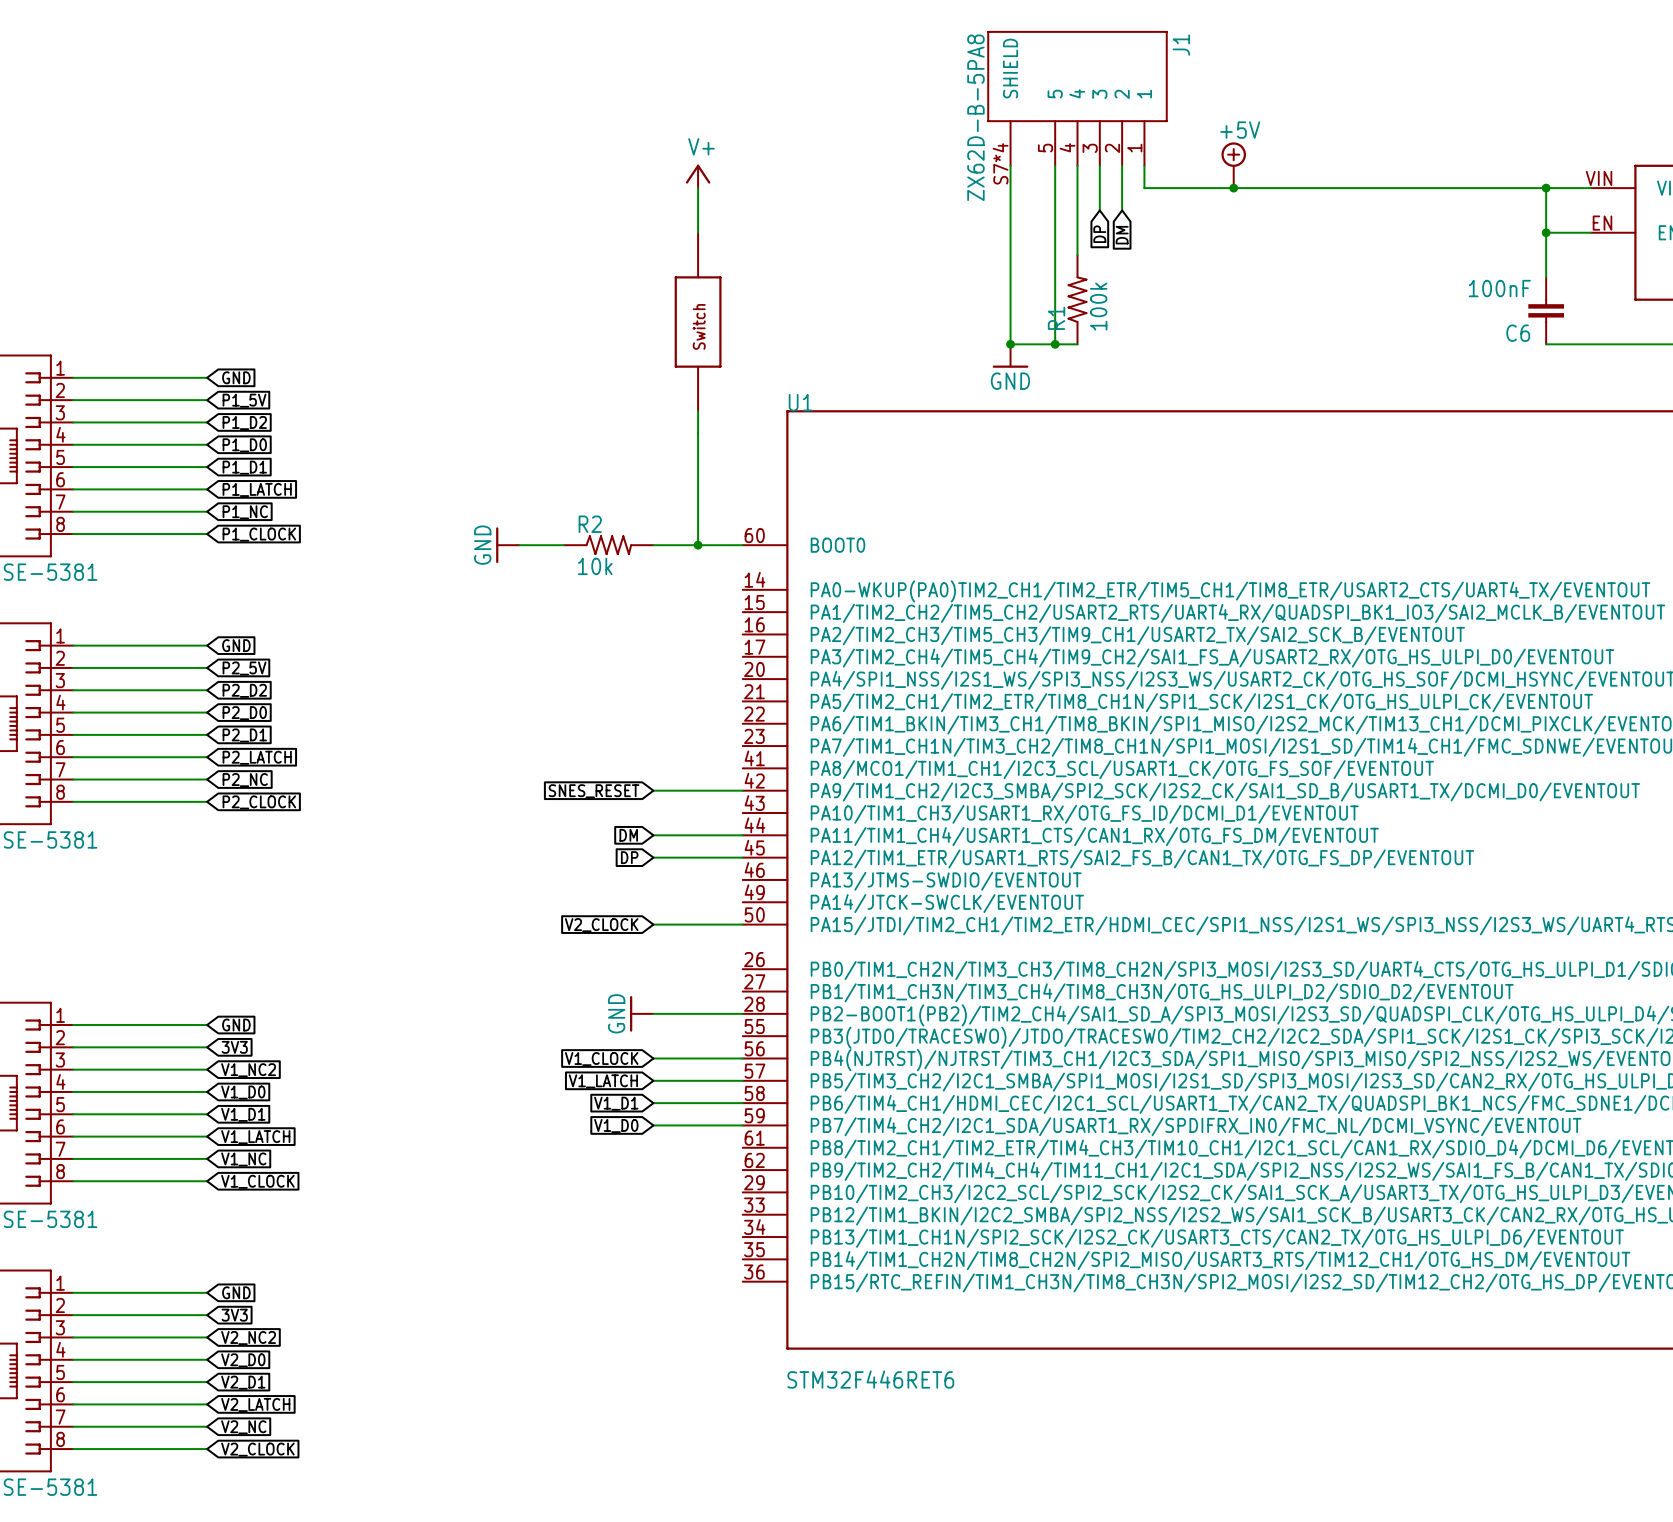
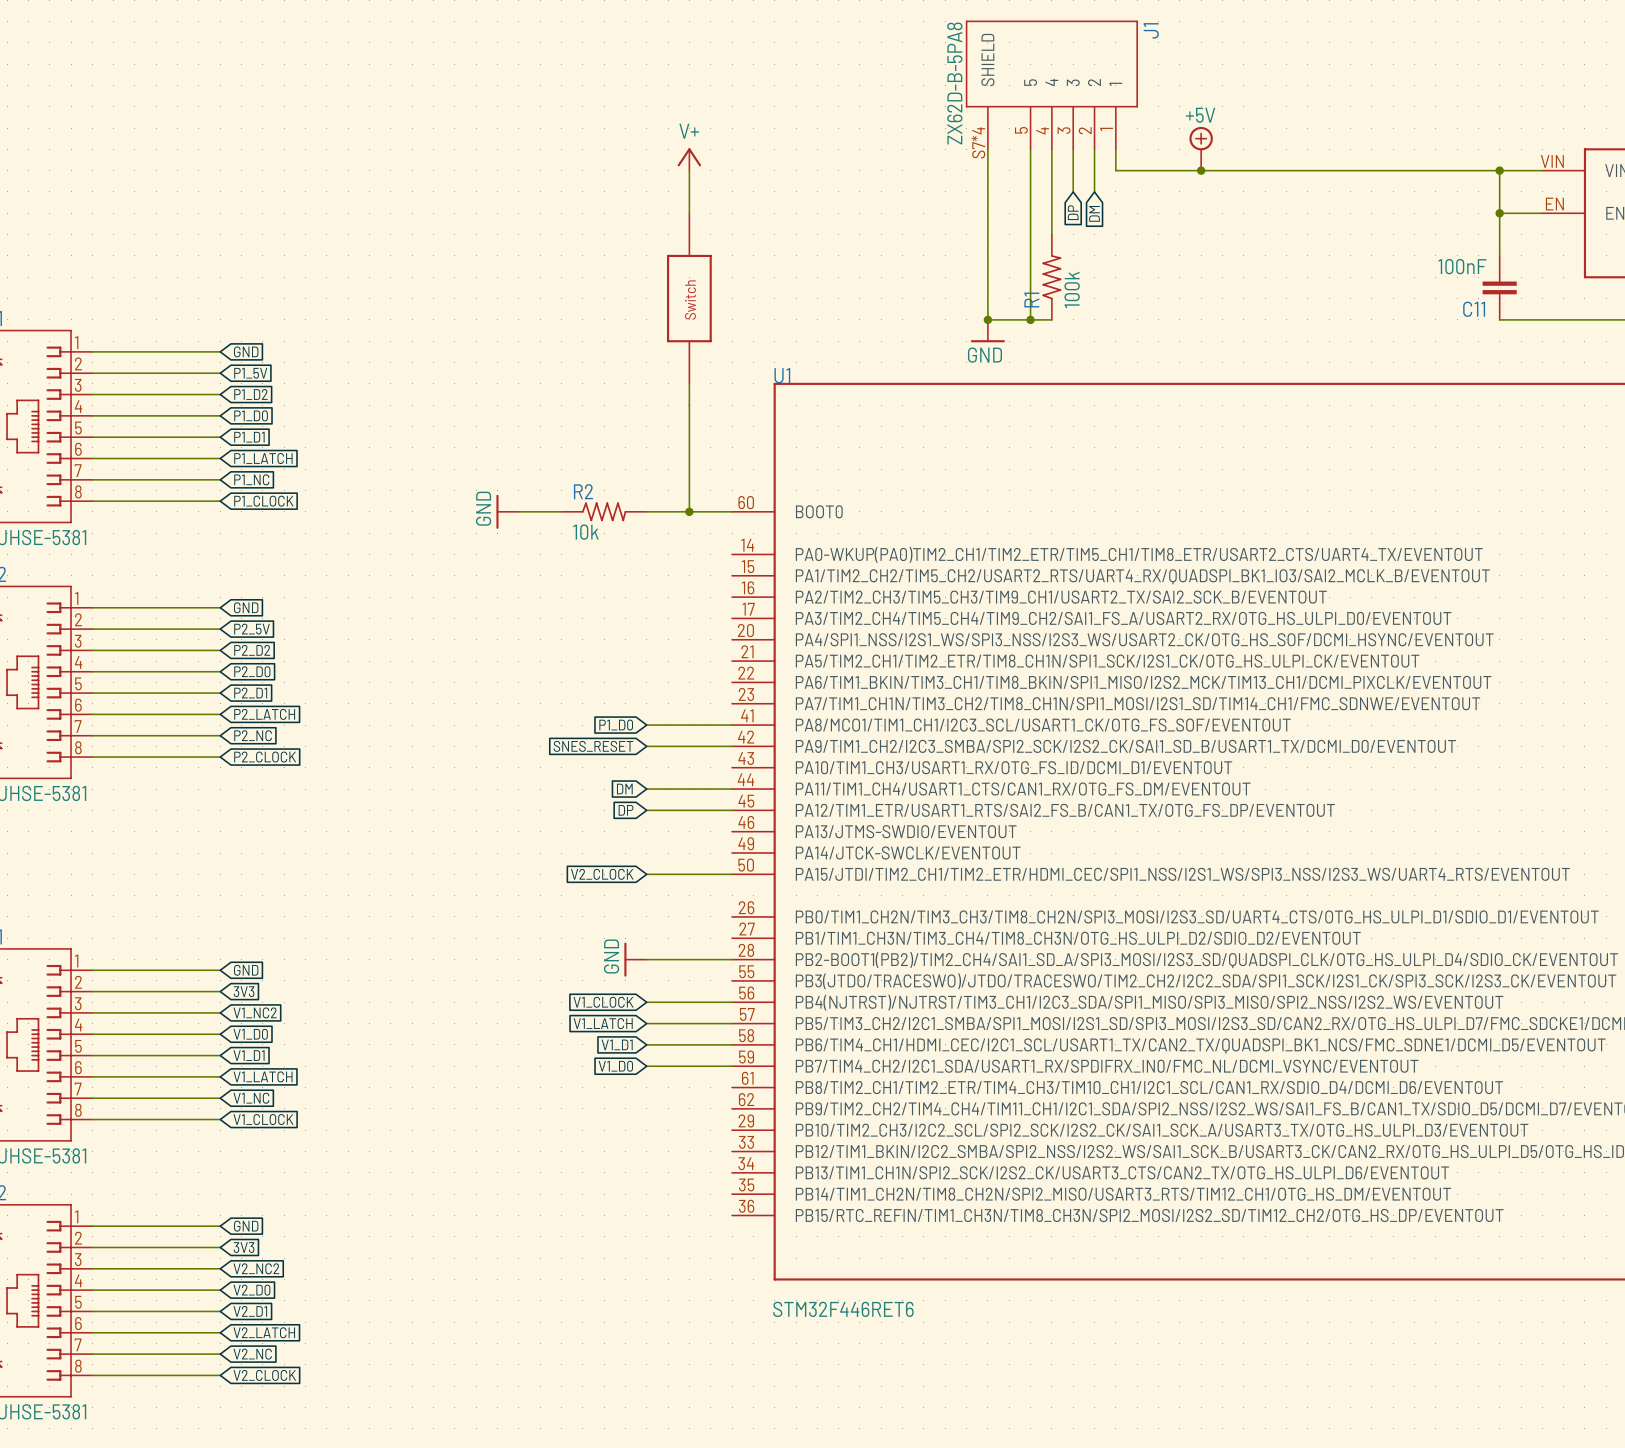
C6 name: C6 (1518, 333) -> C11 (1474, 309)
global label: none -> P1_D0 (616, 725)
wire: none -> (646, 725) (732, 725)

